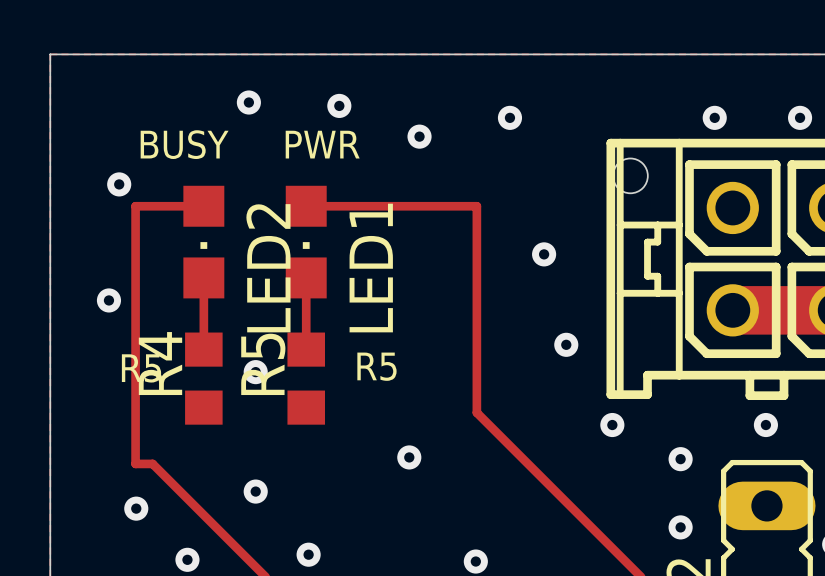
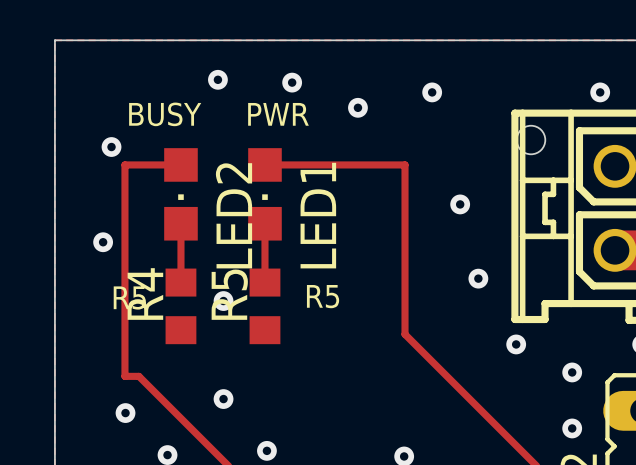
via: (409, 457) -> none

